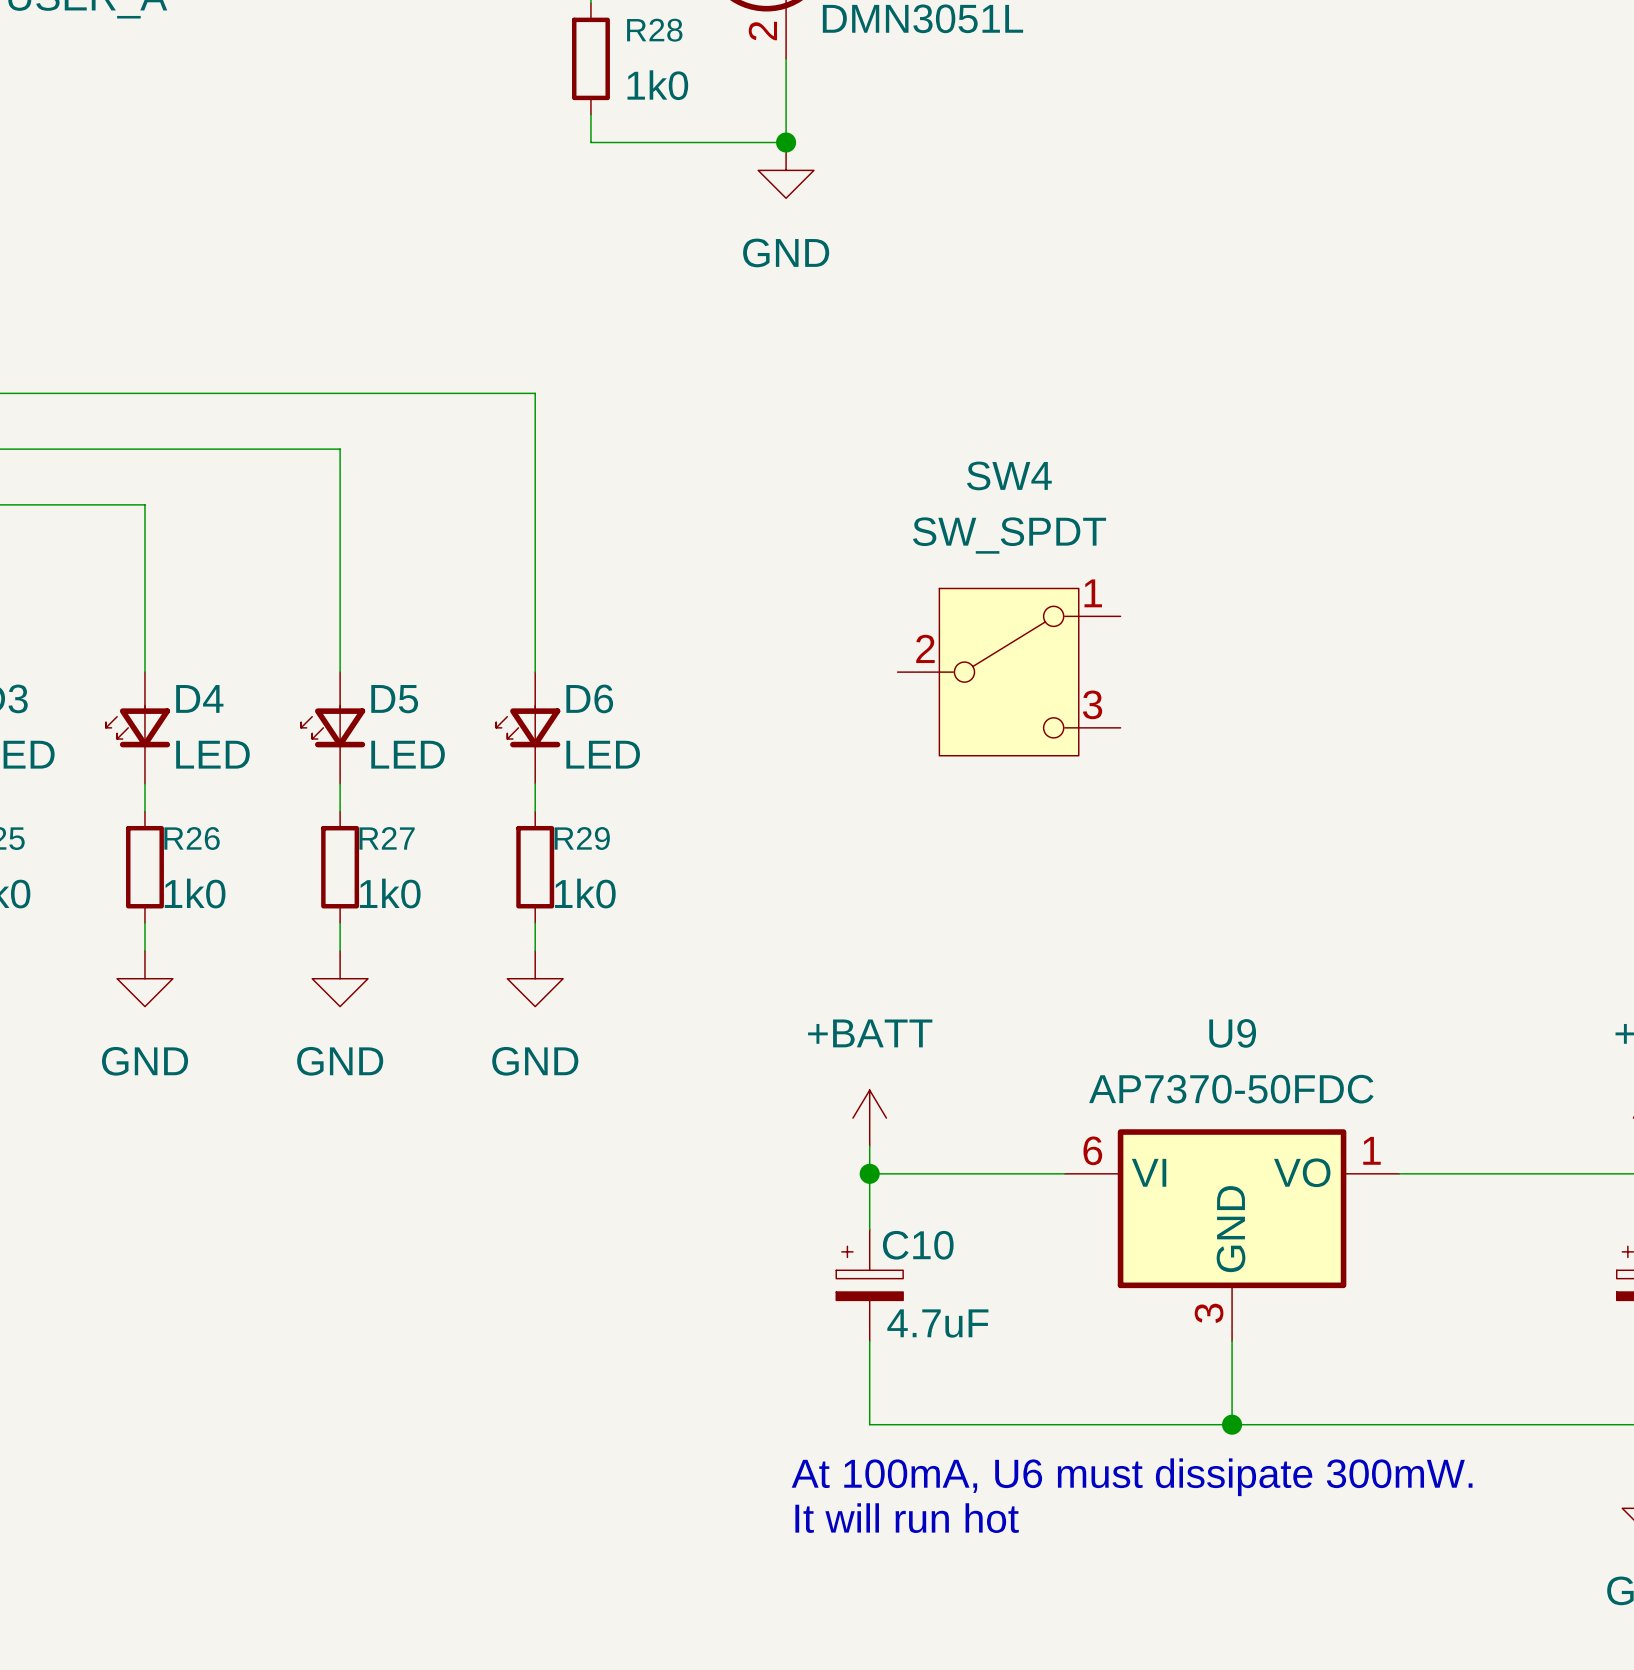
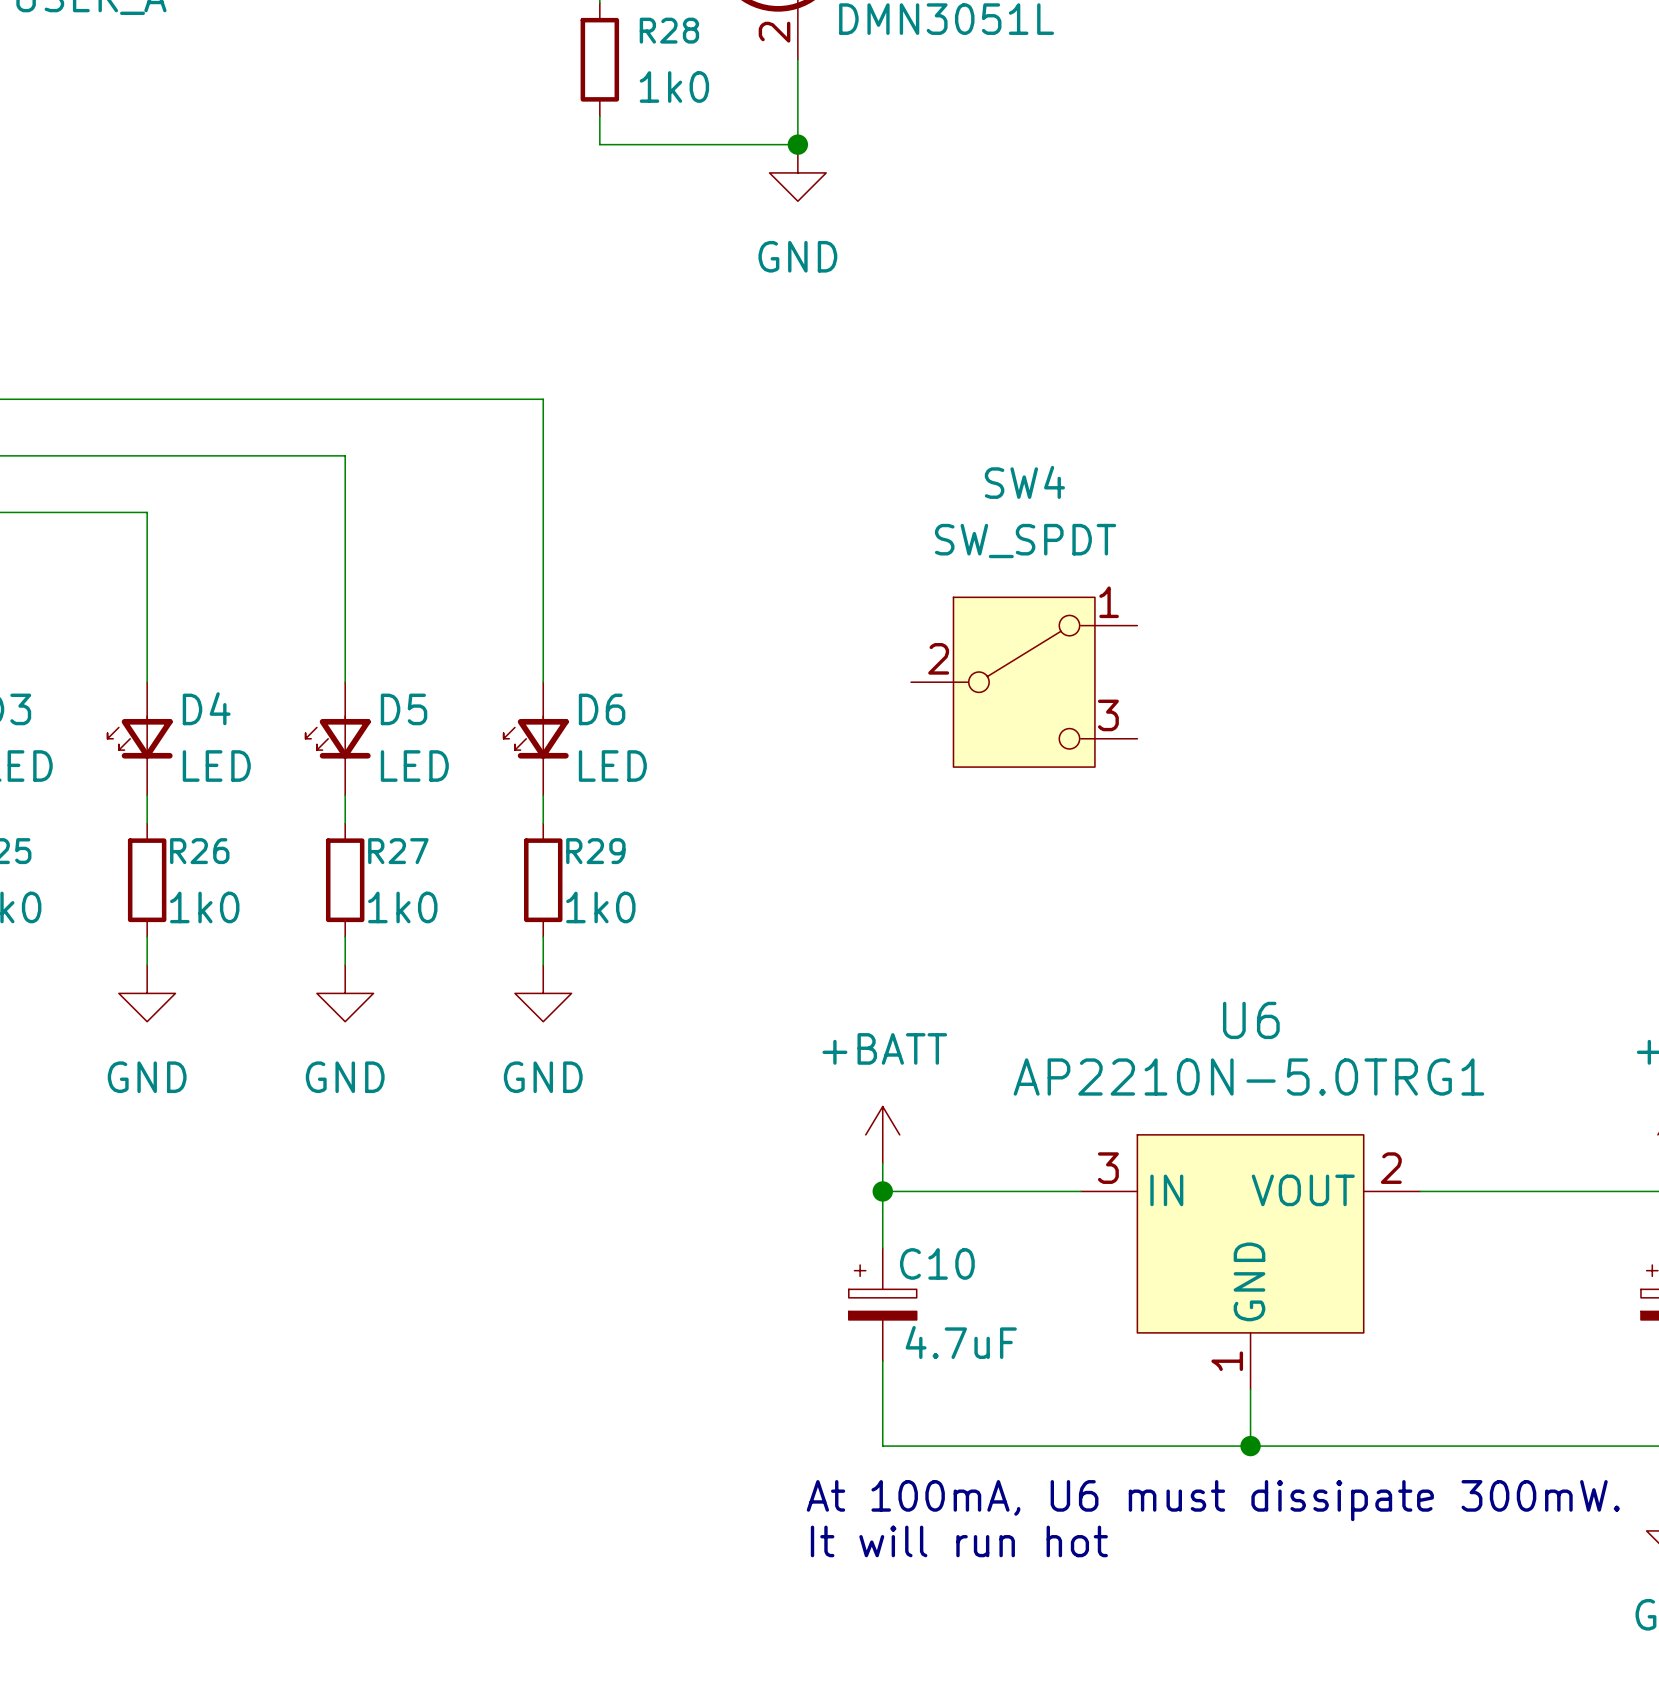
U9: AP7370-50FDC (1232, 1235) -> none
U6: none -> AP2210N-5.0TRG1 (1250, 1262)

